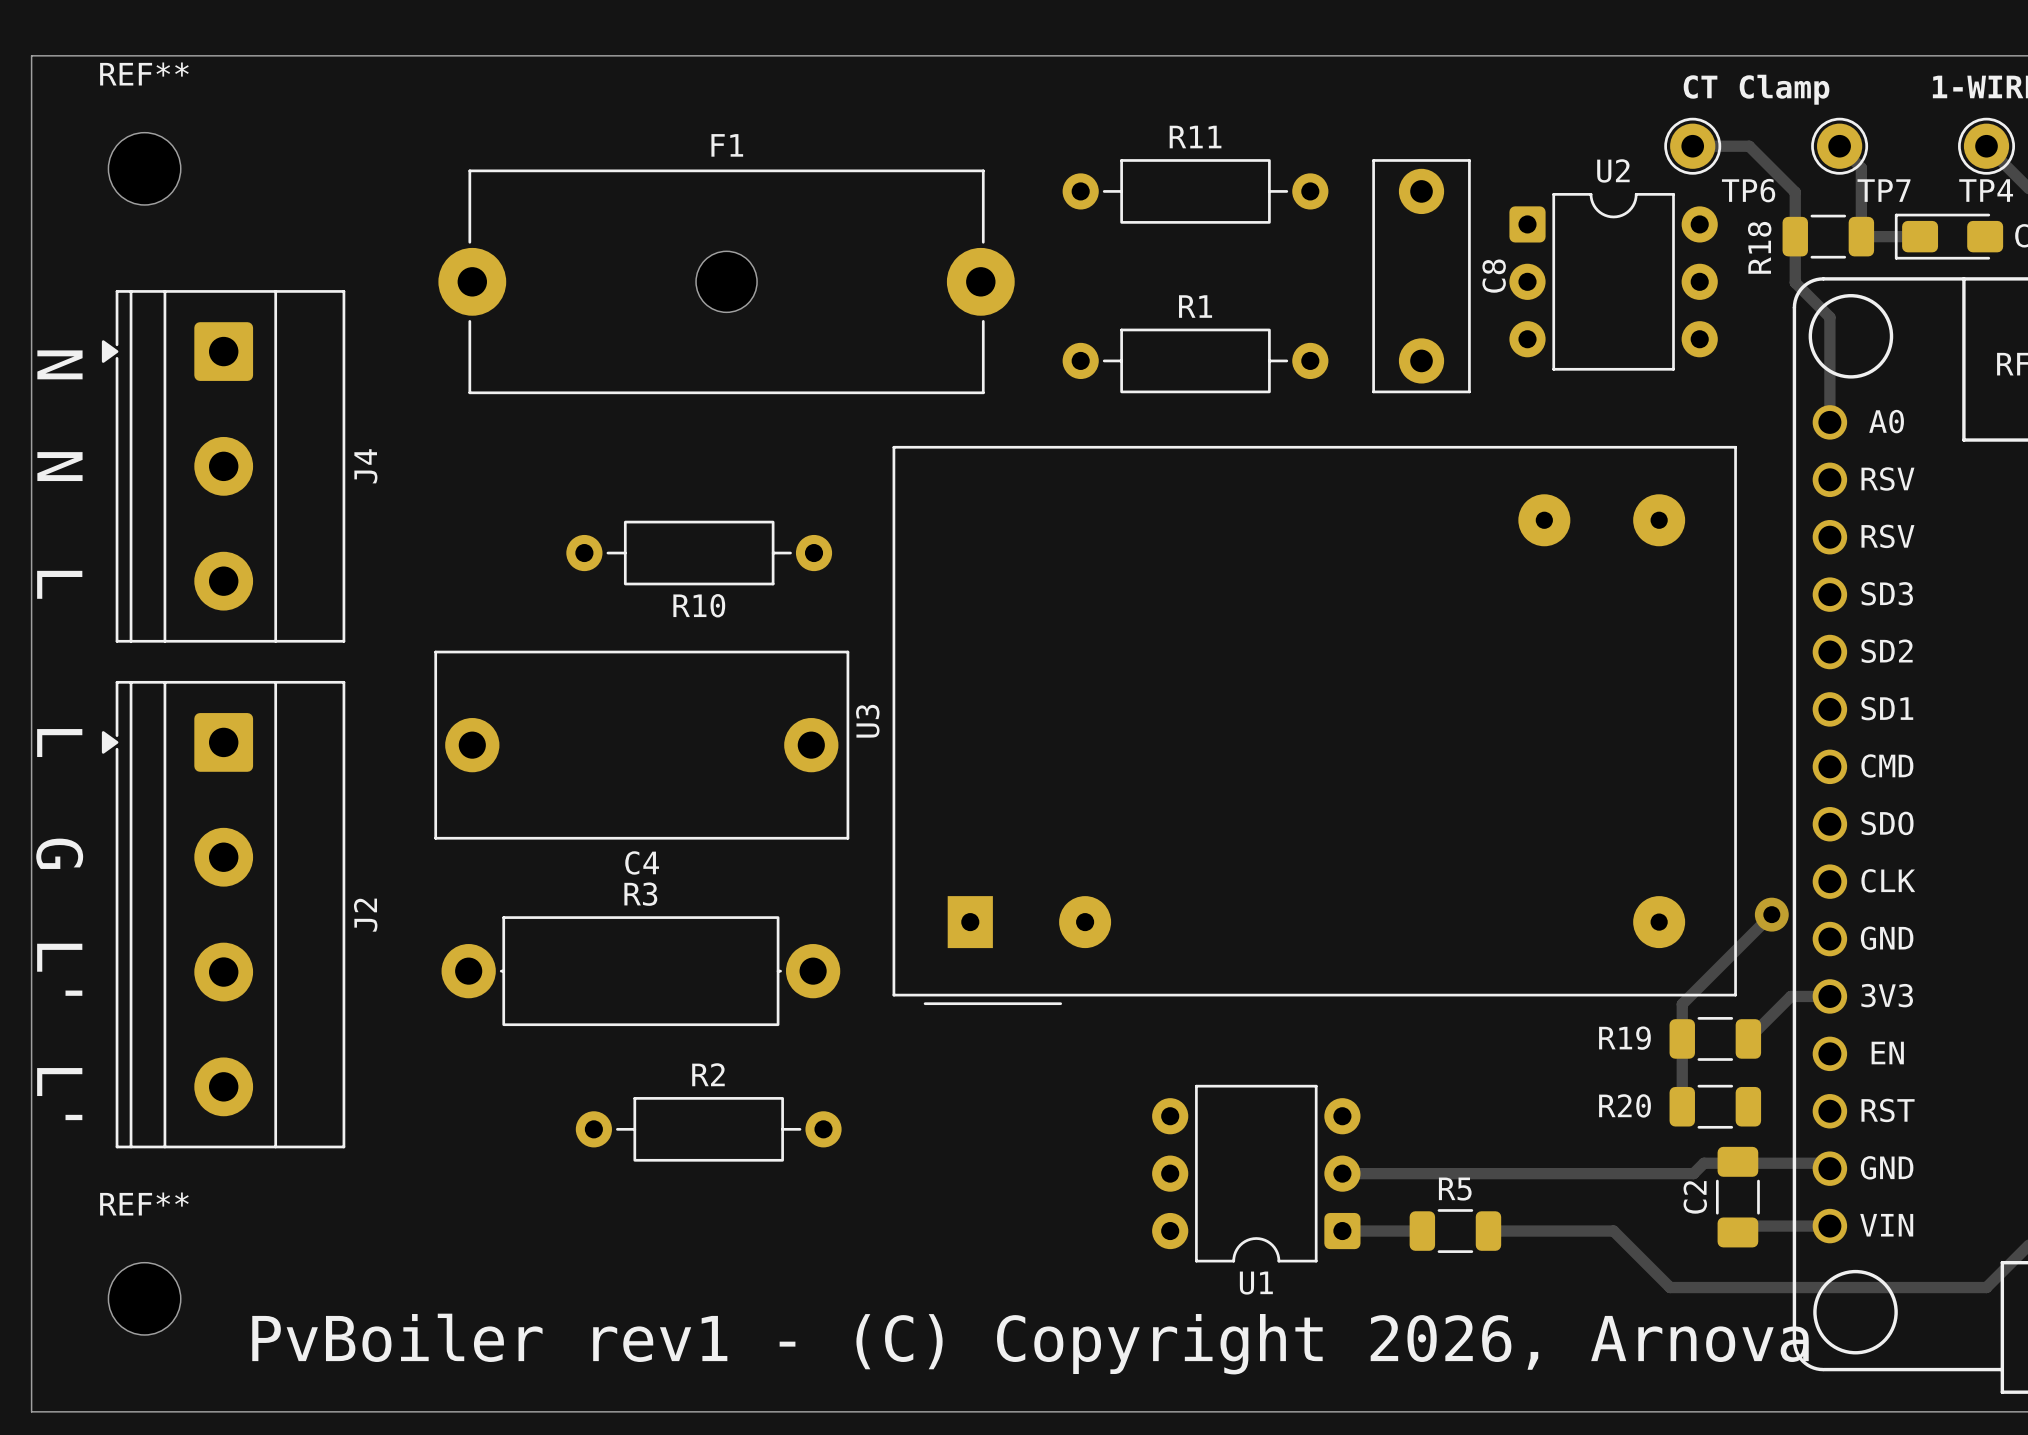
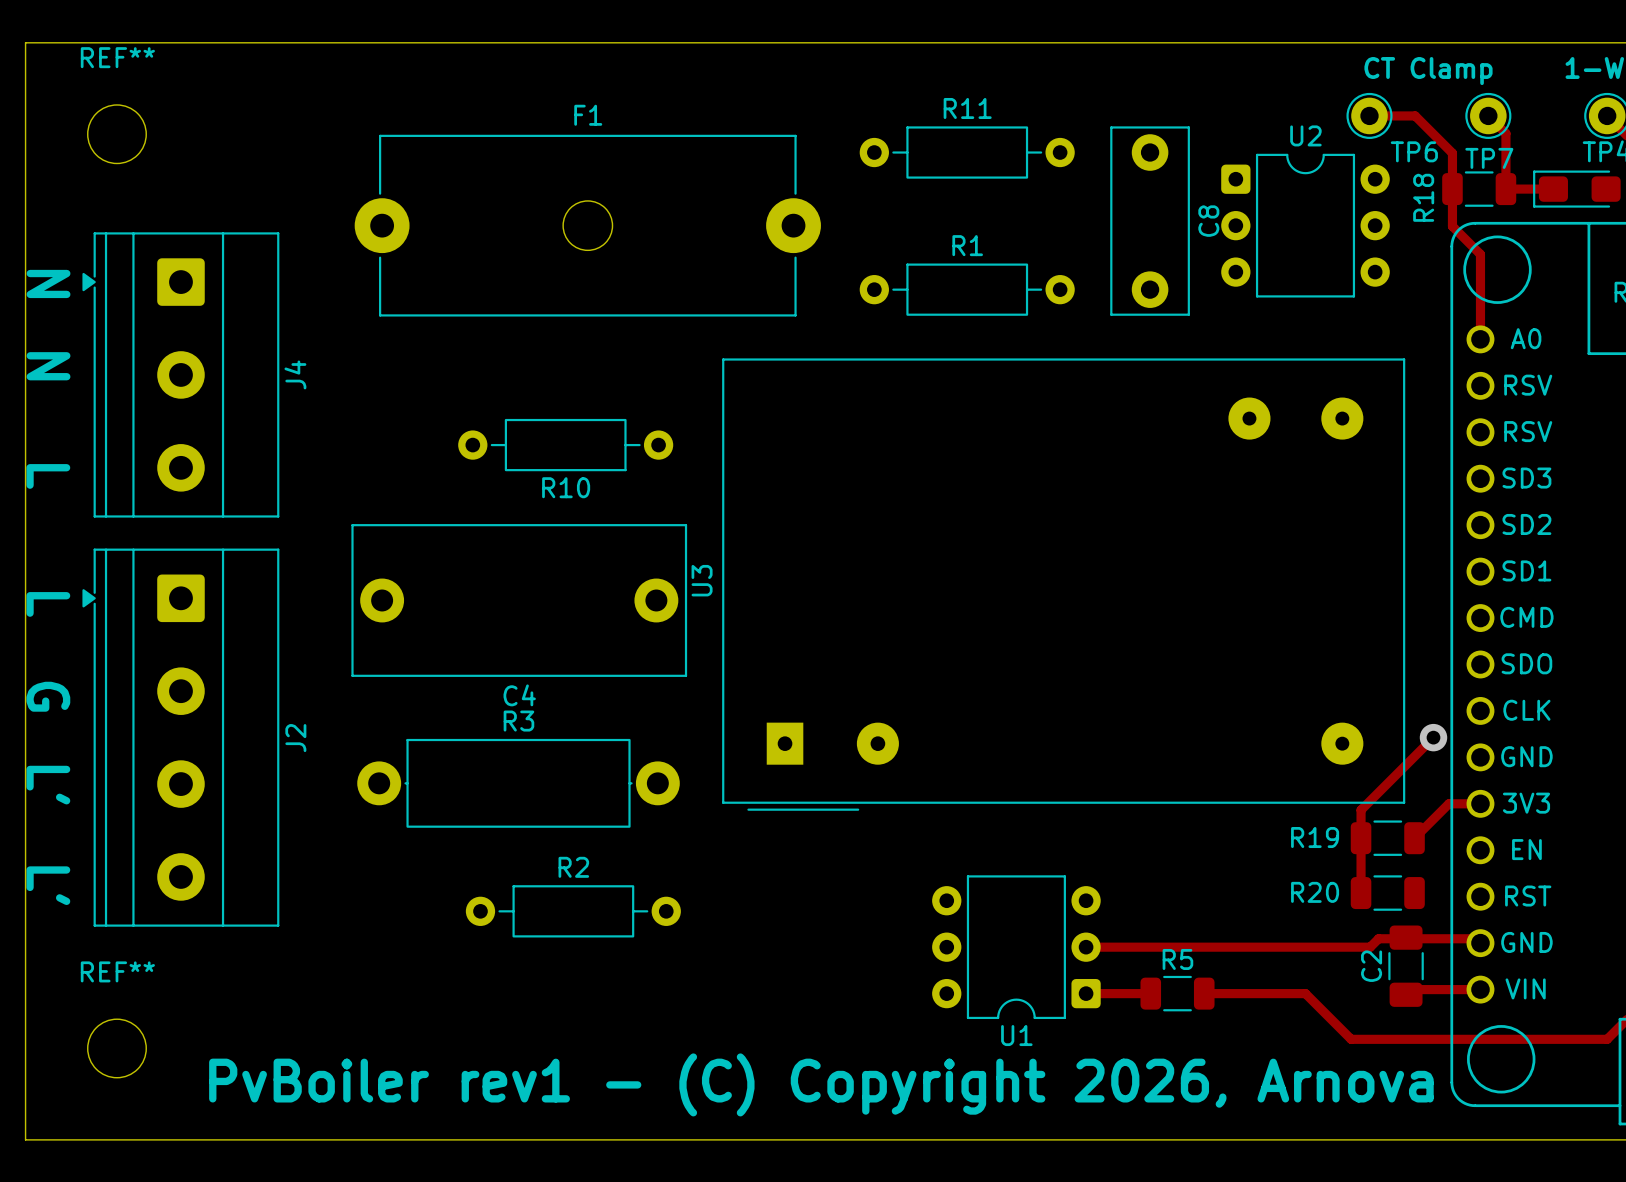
TP7 name position: TP7 (1884, 190) -> TP7 (1489, 158)

